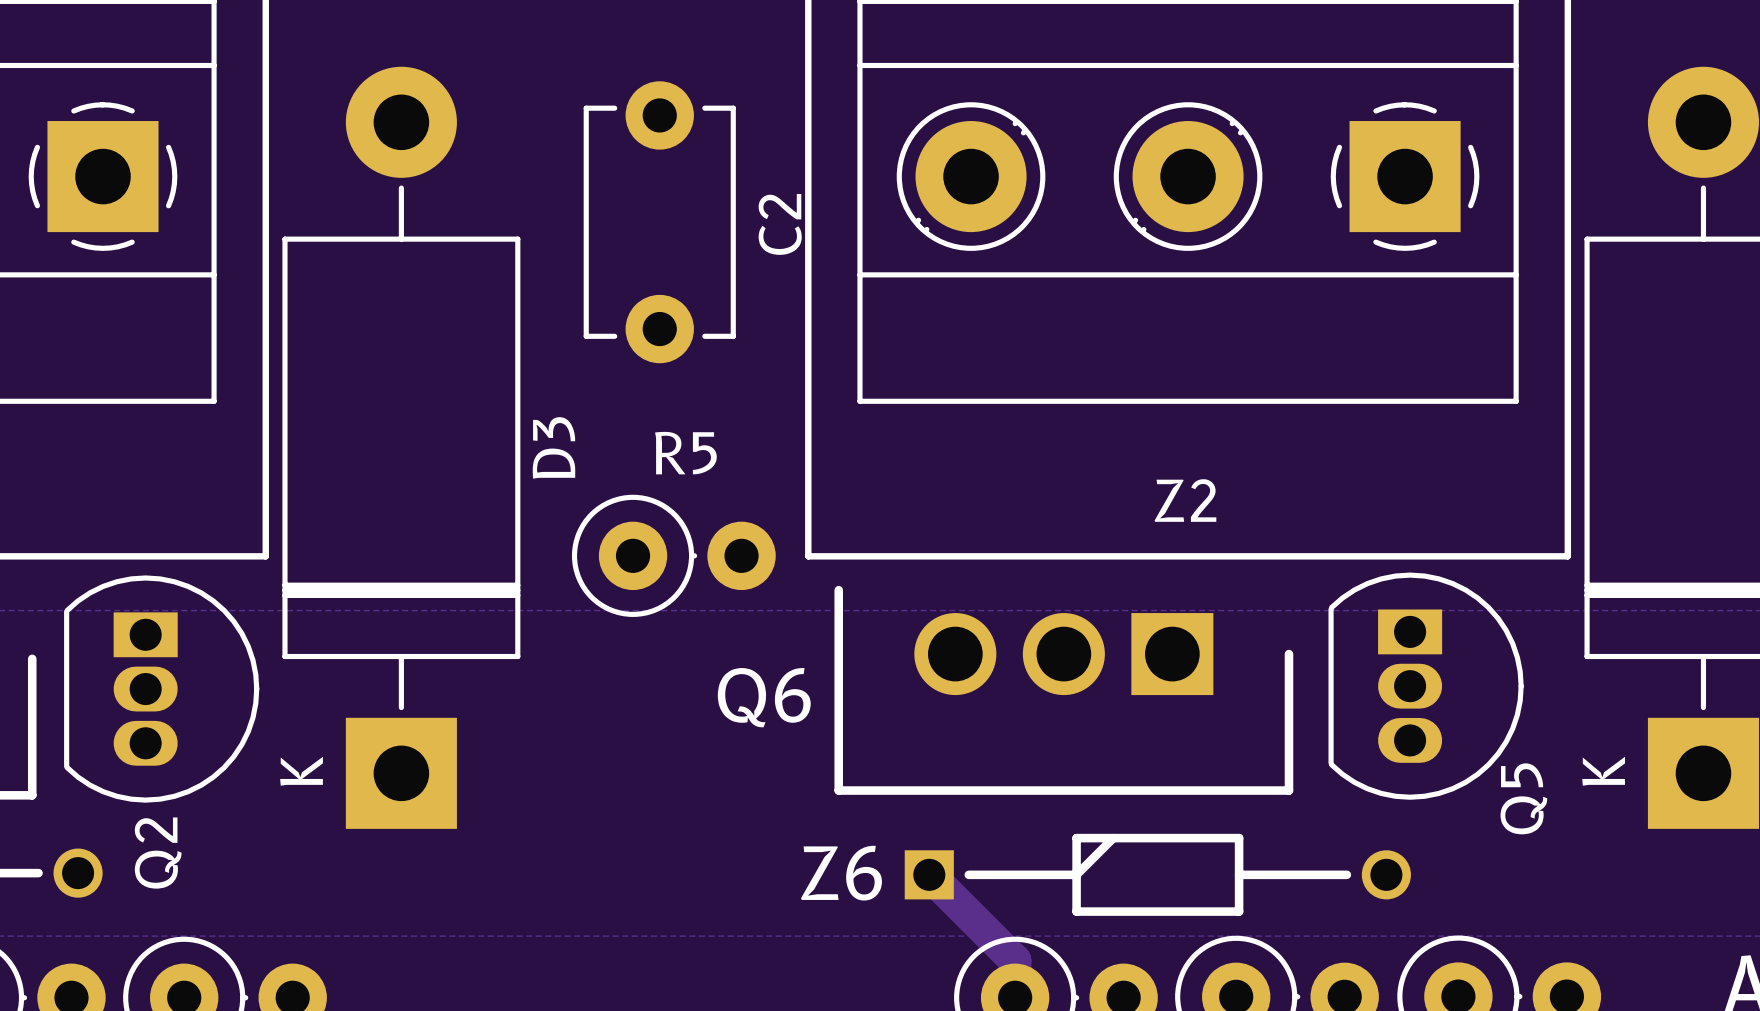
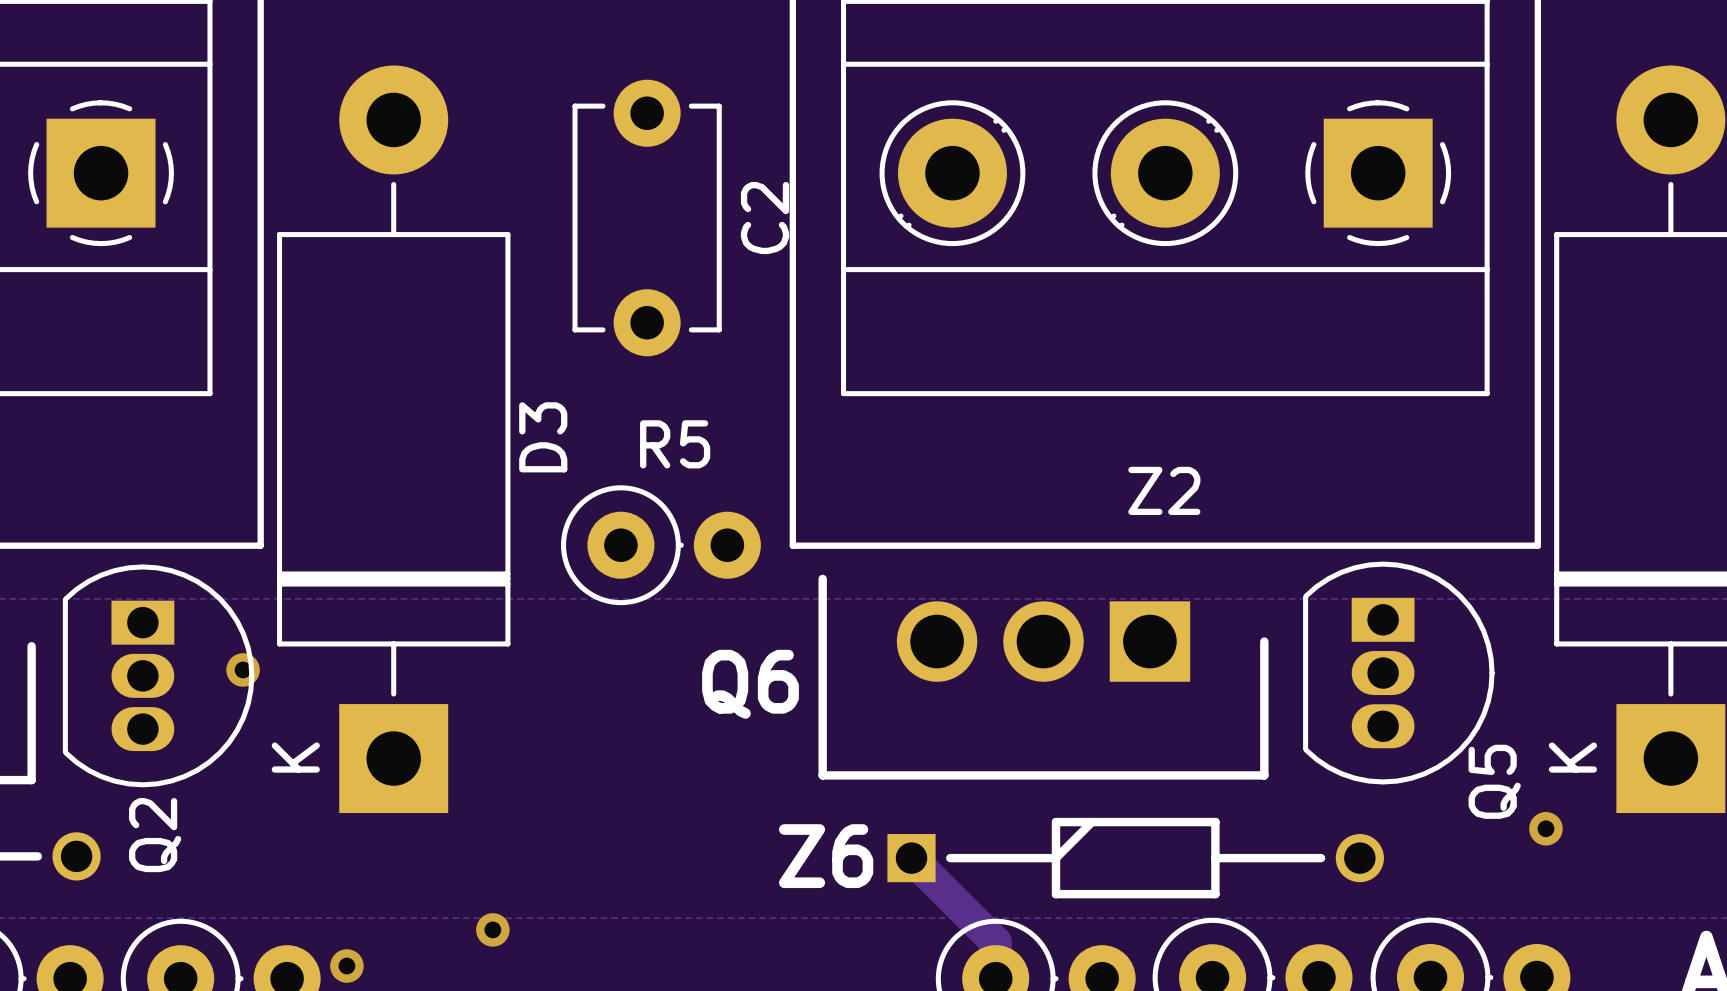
via: none -> (243, 669)
via: none -> (1545, 828)
via: none -> (492, 929)
via: none -> (346, 966)

